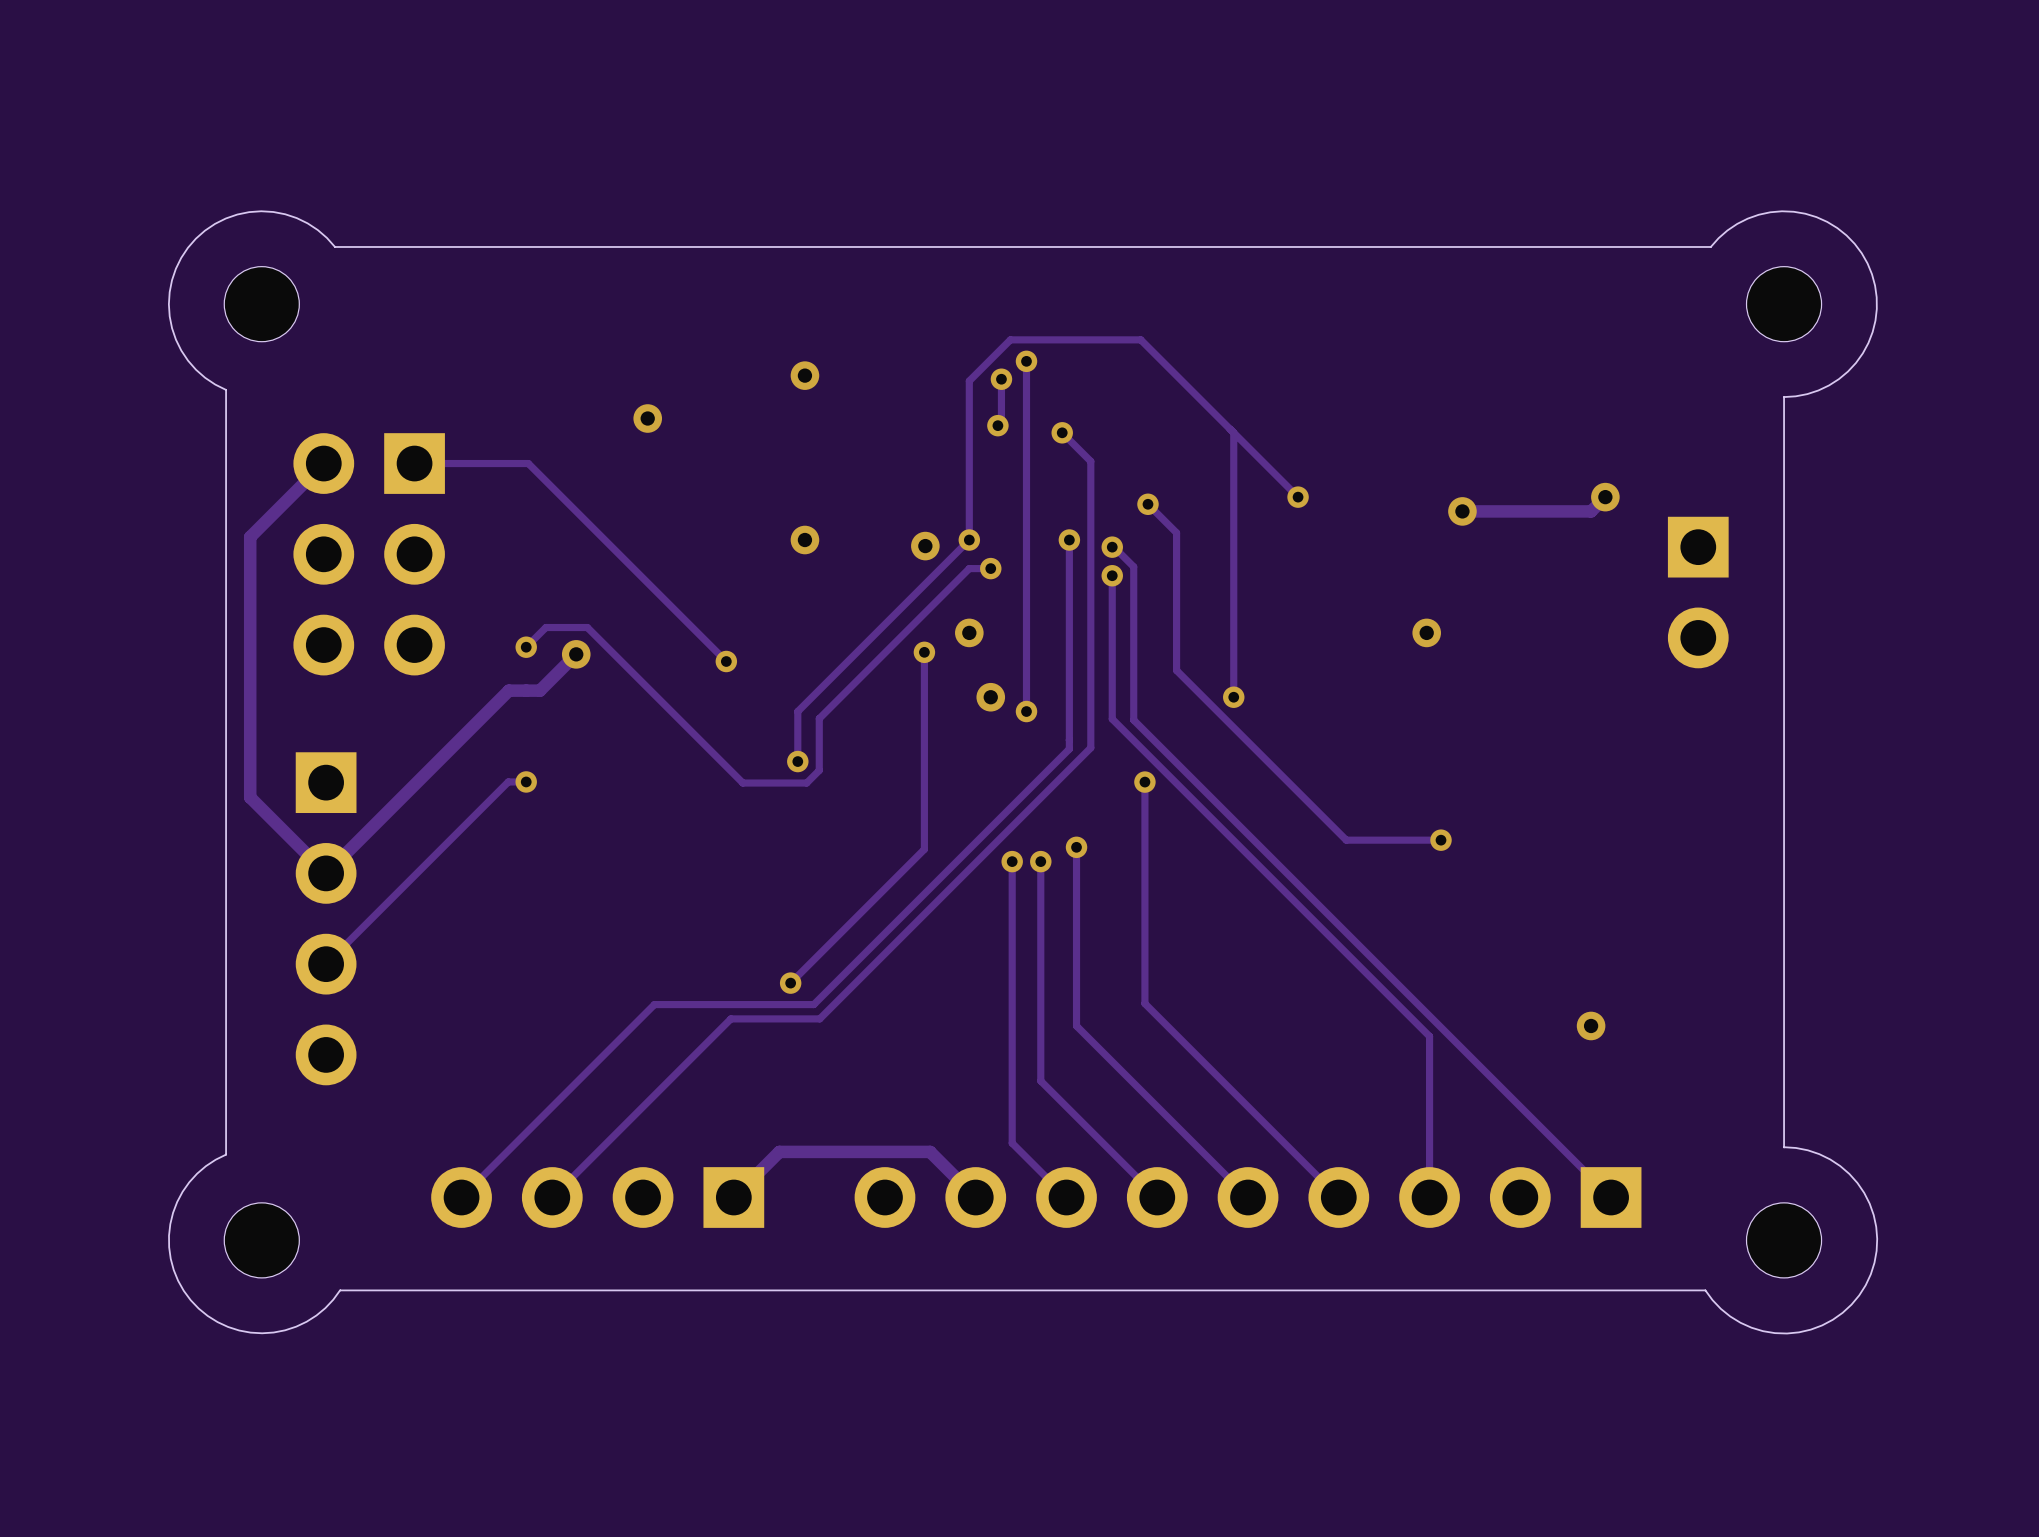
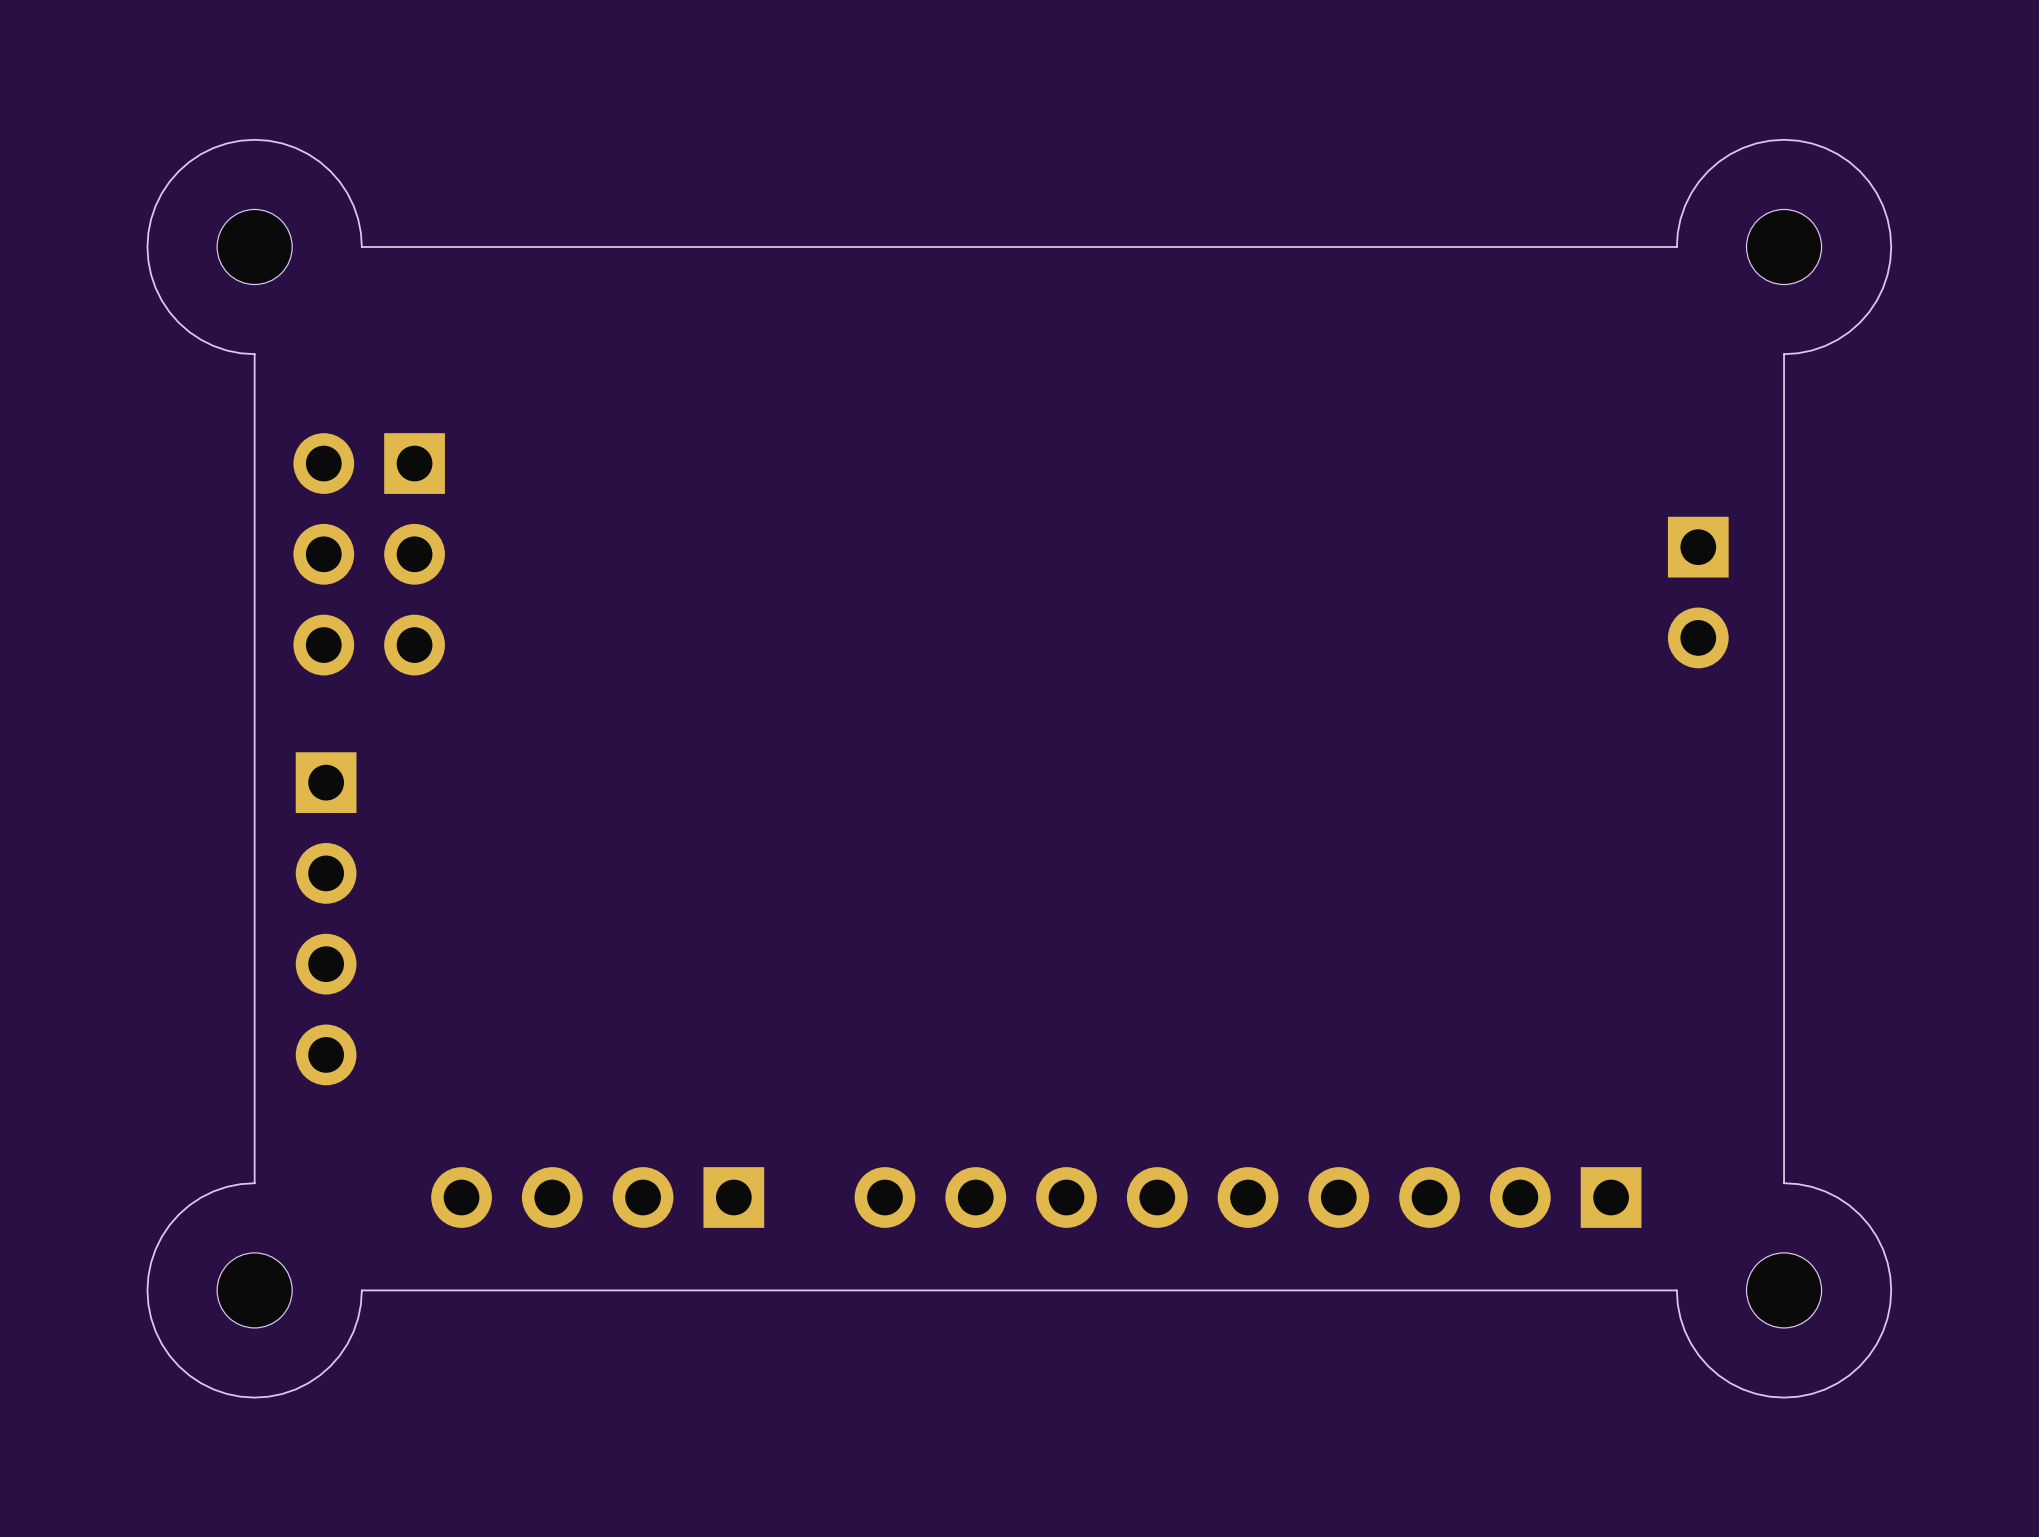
board edge: (361, 246) (335, 246) (317, 230) (296, 218) (285, 214) (261, 211) (237, 214) (215, 223) (195, 238) (187, 247) (181, 257) (172, 280) (168, 304) (172, 328) (181, 350) (196, 369) (205, 377) (226, 389) (226, 1154) (205, 1166) (182, 1191) (170, 1224) (170, 1258) (178, 1280) (198, 1308) (217, 1322) (239, 1330) (262, 1333) (296, 1326) (325, 1308) (340, 1290) -> (361, 246) (358, 219) (353, 205) (339, 181) (330, 171) (319, 161) (295, 147) (282, 143) (254, 139) (226, 143) (213, 147) (189, 161) (178, 171) (169, 181) (155, 205) (151, 219) (147, 246) (151, 274) (155, 288) (169, 312) (178, 322) (189, 332) (213, 346) (226, 350) (254, 354) (254, 1183) (226, 1186) (201, 1197) (189, 1205) (169, 1225) (161, 1236) (151, 1262) (147, 1290) (151, 1318) (161, 1344) (169, 1355) (189, 1375) (201, 1383) (226, 1393) (254, 1397) (268, 1396) (282, 1393) (308, 1383) (319, 1375) (339, 1355) (347, 1344) (358, 1318) (361, 1290)
board edge: (1676, 246) (1710, 246) (1737, 223) (1758, 214) (1781, 211) (1805, 213) (1827, 221) (1846, 235) (1861, 253) (1872, 274) (1876, 297) (1875, 320) (1868, 343) (1848, 371) (1829, 385) (1807, 394) (1784, 397) -> (1676, 246) (1680, 219) (1691, 193) (1698, 181) (1718, 161) (1730, 154) (1756, 143) (1784, 139) (1811, 143) (1837, 154) (1849, 161) (1869, 181) (1883, 205) (1890, 233) (1890, 260) (1883, 288) (1869, 312) (1849, 332) (1837, 339) (1811, 350) (1784, 354) (1784, 397)
part position: (261, 304) -> (254, 246)
part position: (1784, 304) -> (1784, 246)
track: (1026, 361) (1026, 711) -> none
via: (1026, 361) -> none
via: (804, 375) -> none
track: (1001, 379) (1001, 422) (997, 425) -> none
via: (1001, 379) -> none
via: (647, 418) -> none
via: (997, 425) -> none
track: (1062, 432) (1090, 461) (1090, 747) (819, 1018) (730, 1018) (552, 1197) -> none
via: (1062, 432) -> none
track: (1233, 432) (1233, 697) -> none
track: (323, 463) (250, 537) (250, 797) (326, 873) (508, 690) (539, 690) (576, 654) -> none
track: (414, 463) (528, 463) (726, 661) -> none
track: (1298, 497) (1140, 339) (1010, 339) (969, 380) (969, 540) (797, 711) (797, 761) -> none
via: (1298, 497) -> none
track: (1605, 497) (1591, 511) (1462, 511) -> none
via: (1605, 497) -> none
track: (1147, 504) (1176, 532) (1176, 670) (1346, 840) (1441, 840) -> none
via: (1147, 504) -> none
via: (1462, 511) -> none
via: (804, 540) -> none
via: (969, 540) -> none
track: (1069, 540) (1069, 749) (813, 1004) (654, 1004) (461, 1197) -> none
via: (1069, 540) -> none
via: (925, 546) -> none
track: (1112, 547) (1133, 566) (1133, 720) (1611, 1197) -> none
via: (1112, 547) -> none
track: (990, 568) (969, 568) (819, 718) (819, 770) (806, 783) (742, 783) (587, 627) (545, 627) (526, 647) -> none
via: (990, 568) -> none
track: (1112, 575) (1112, 719) (1429, 1036) (1429, 1197) -> none
via: (1112, 575) -> none
via: (969, 632) -> none
via: (1426, 632) -> none
via: (526, 647) -> none
track: (924, 652) (924, 849) (790, 983) -> none
via: (924, 652) -> none
via: (576, 654) -> none
via: (726, 661) -> none
via: (990, 697) -> none
via: (1233, 697) -> none
via: (1026, 711) -> none
via: (797, 761) -> none
track: (526, 781) (508, 781) (326, 964) -> none
via: (526, 781) -> none
track: (1144, 782) (1144, 1003) (1338, 1197) -> none
via: (1144, 782) -> none
via: (1441, 840) -> none
track: (1076, 847) (1076, 1025) (1248, 1197) -> none
via: (1076, 847) -> none
track: (1012, 861) (1012, 1143) (1066, 1197) -> none
via: (1012, 861) -> none
track: (1040, 861) (1040, 1081) (1157, 1197) -> none
via: (1040, 861) -> none
via: (790, 983) -> none
via: (1591, 1025) -> none
board edge: (1784, 1147) (1796, 1147) (1819, 1154) (1840, 1166) (1857, 1182) (1869, 1203) (1876, 1226) (1876, 1250) (1870, 1274) (1859, 1295) (1842, 1312) (1832, 1319) (1810, 1329) (1787, 1333) (1763, 1331) (1740, 1322) (1720, 1308) (1705, 1290) (1676, 1290) -> (1784, 1147) (1784, 1183) (1811, 1186) (1837, 1197) (1849, 1205) (1869, 1225) (1883, 1249) (1890, 1276) (1890, 1304) (1883, 1331) (1869, 1355) (1849, 1375) (1837, 1383) (1811, 1393) (1784, 1397) (1756, 1393) (1730, 1383) (1718, 1375) (1698, 1355) (1691, 1344) (1680, 1318) (1676, 1290)
track: (975, 1197) (930, 1151) (779, 1151) (733, 1197) -> none
part position: (261, 1240) -> (254, 1290)
part position: (1784, 1240) -> (1784, 1290)
board edge: (361, 1290) (340, 1290) -> none

